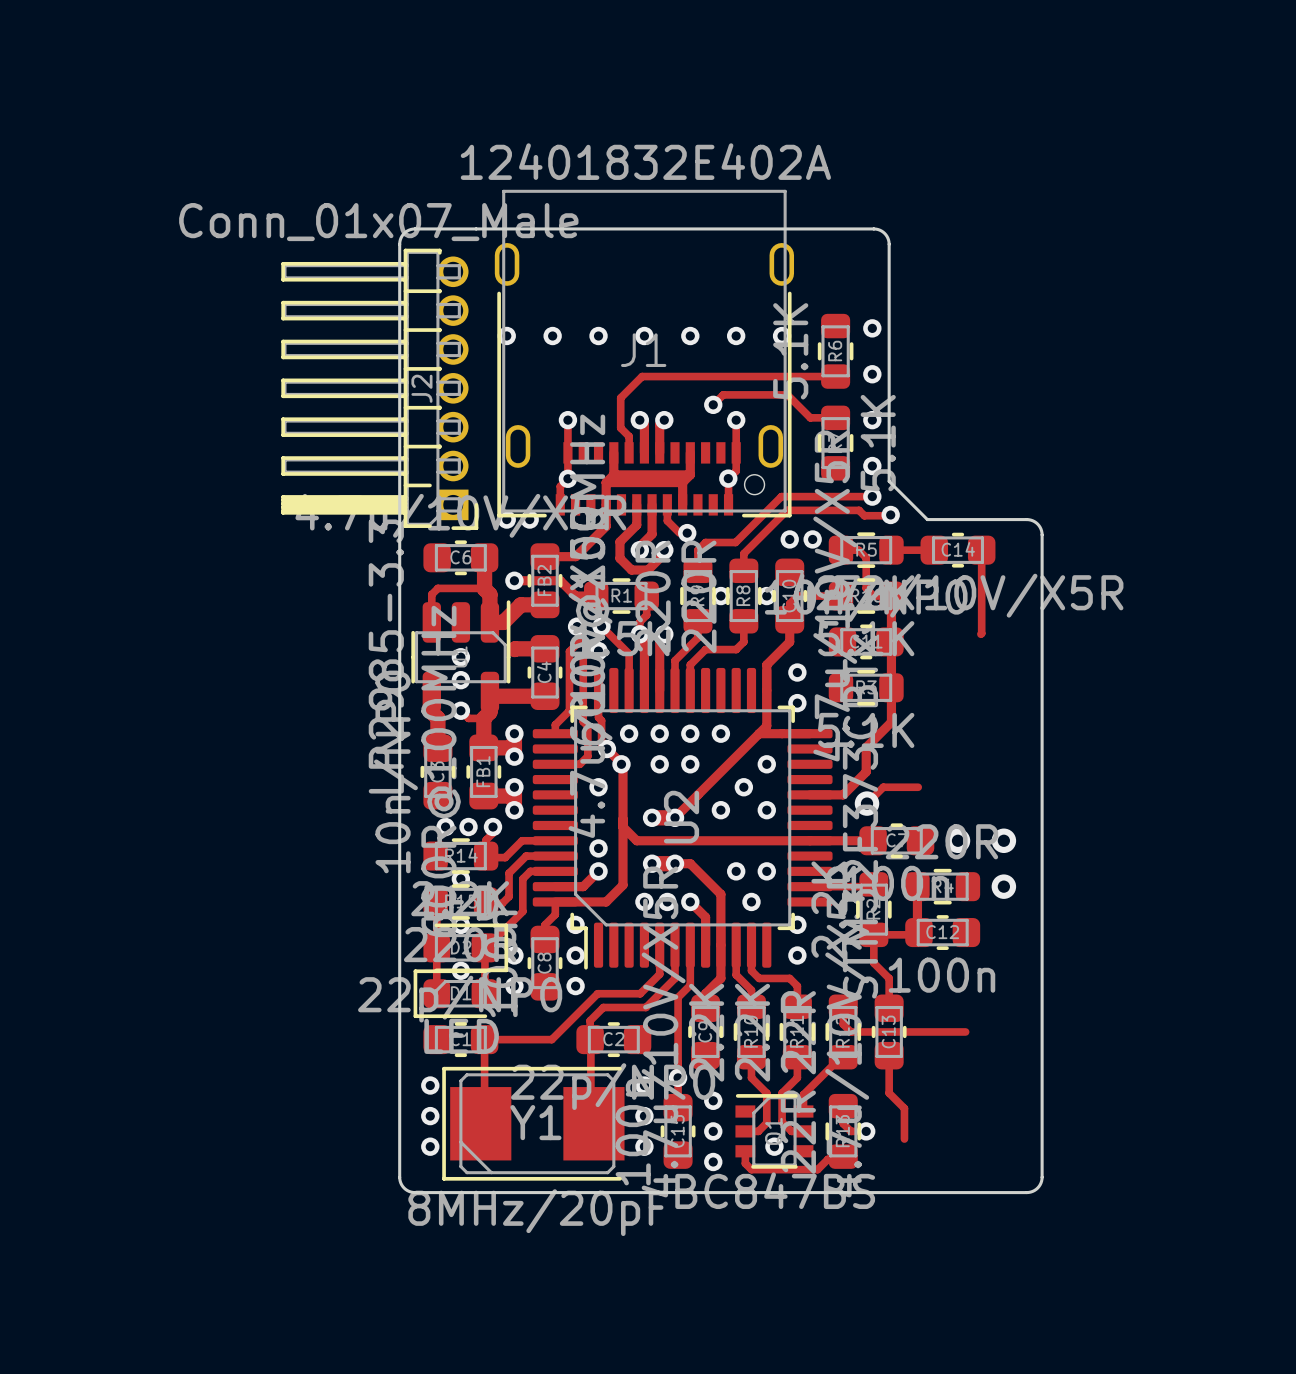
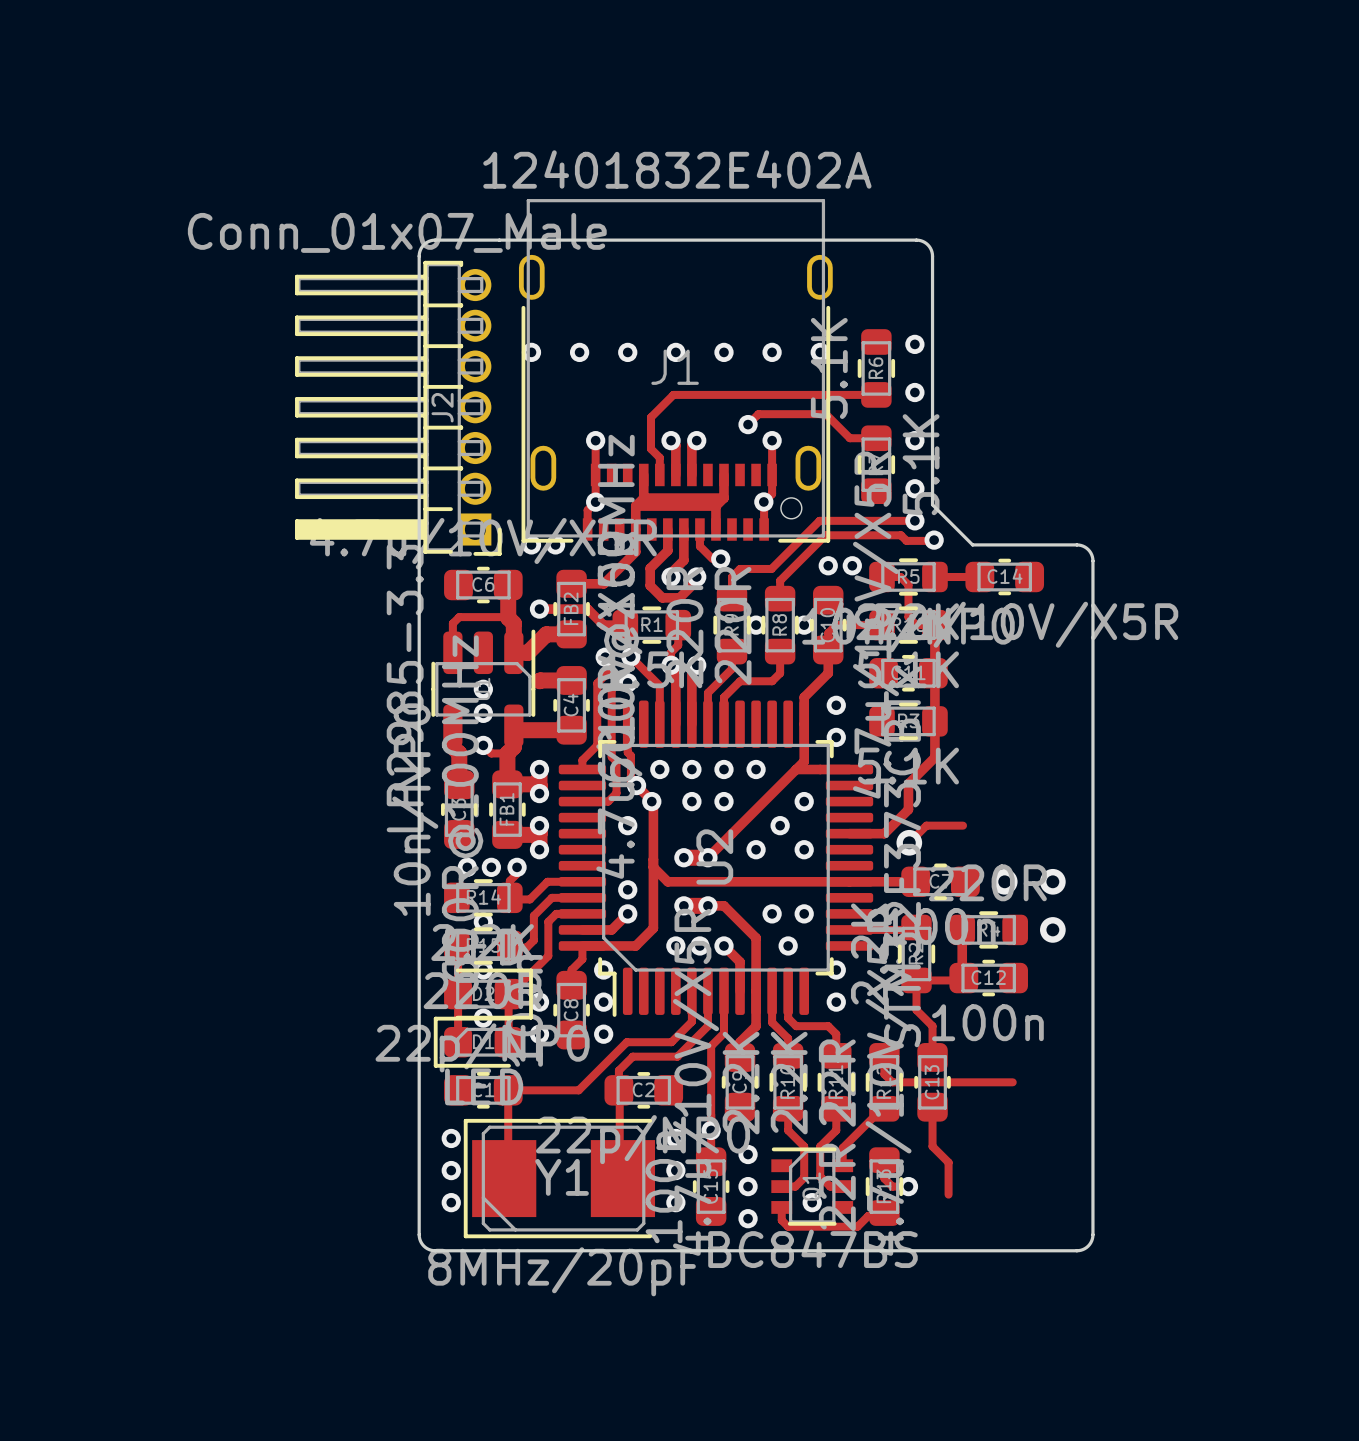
track: (981, 550) (980, 634) -> none

